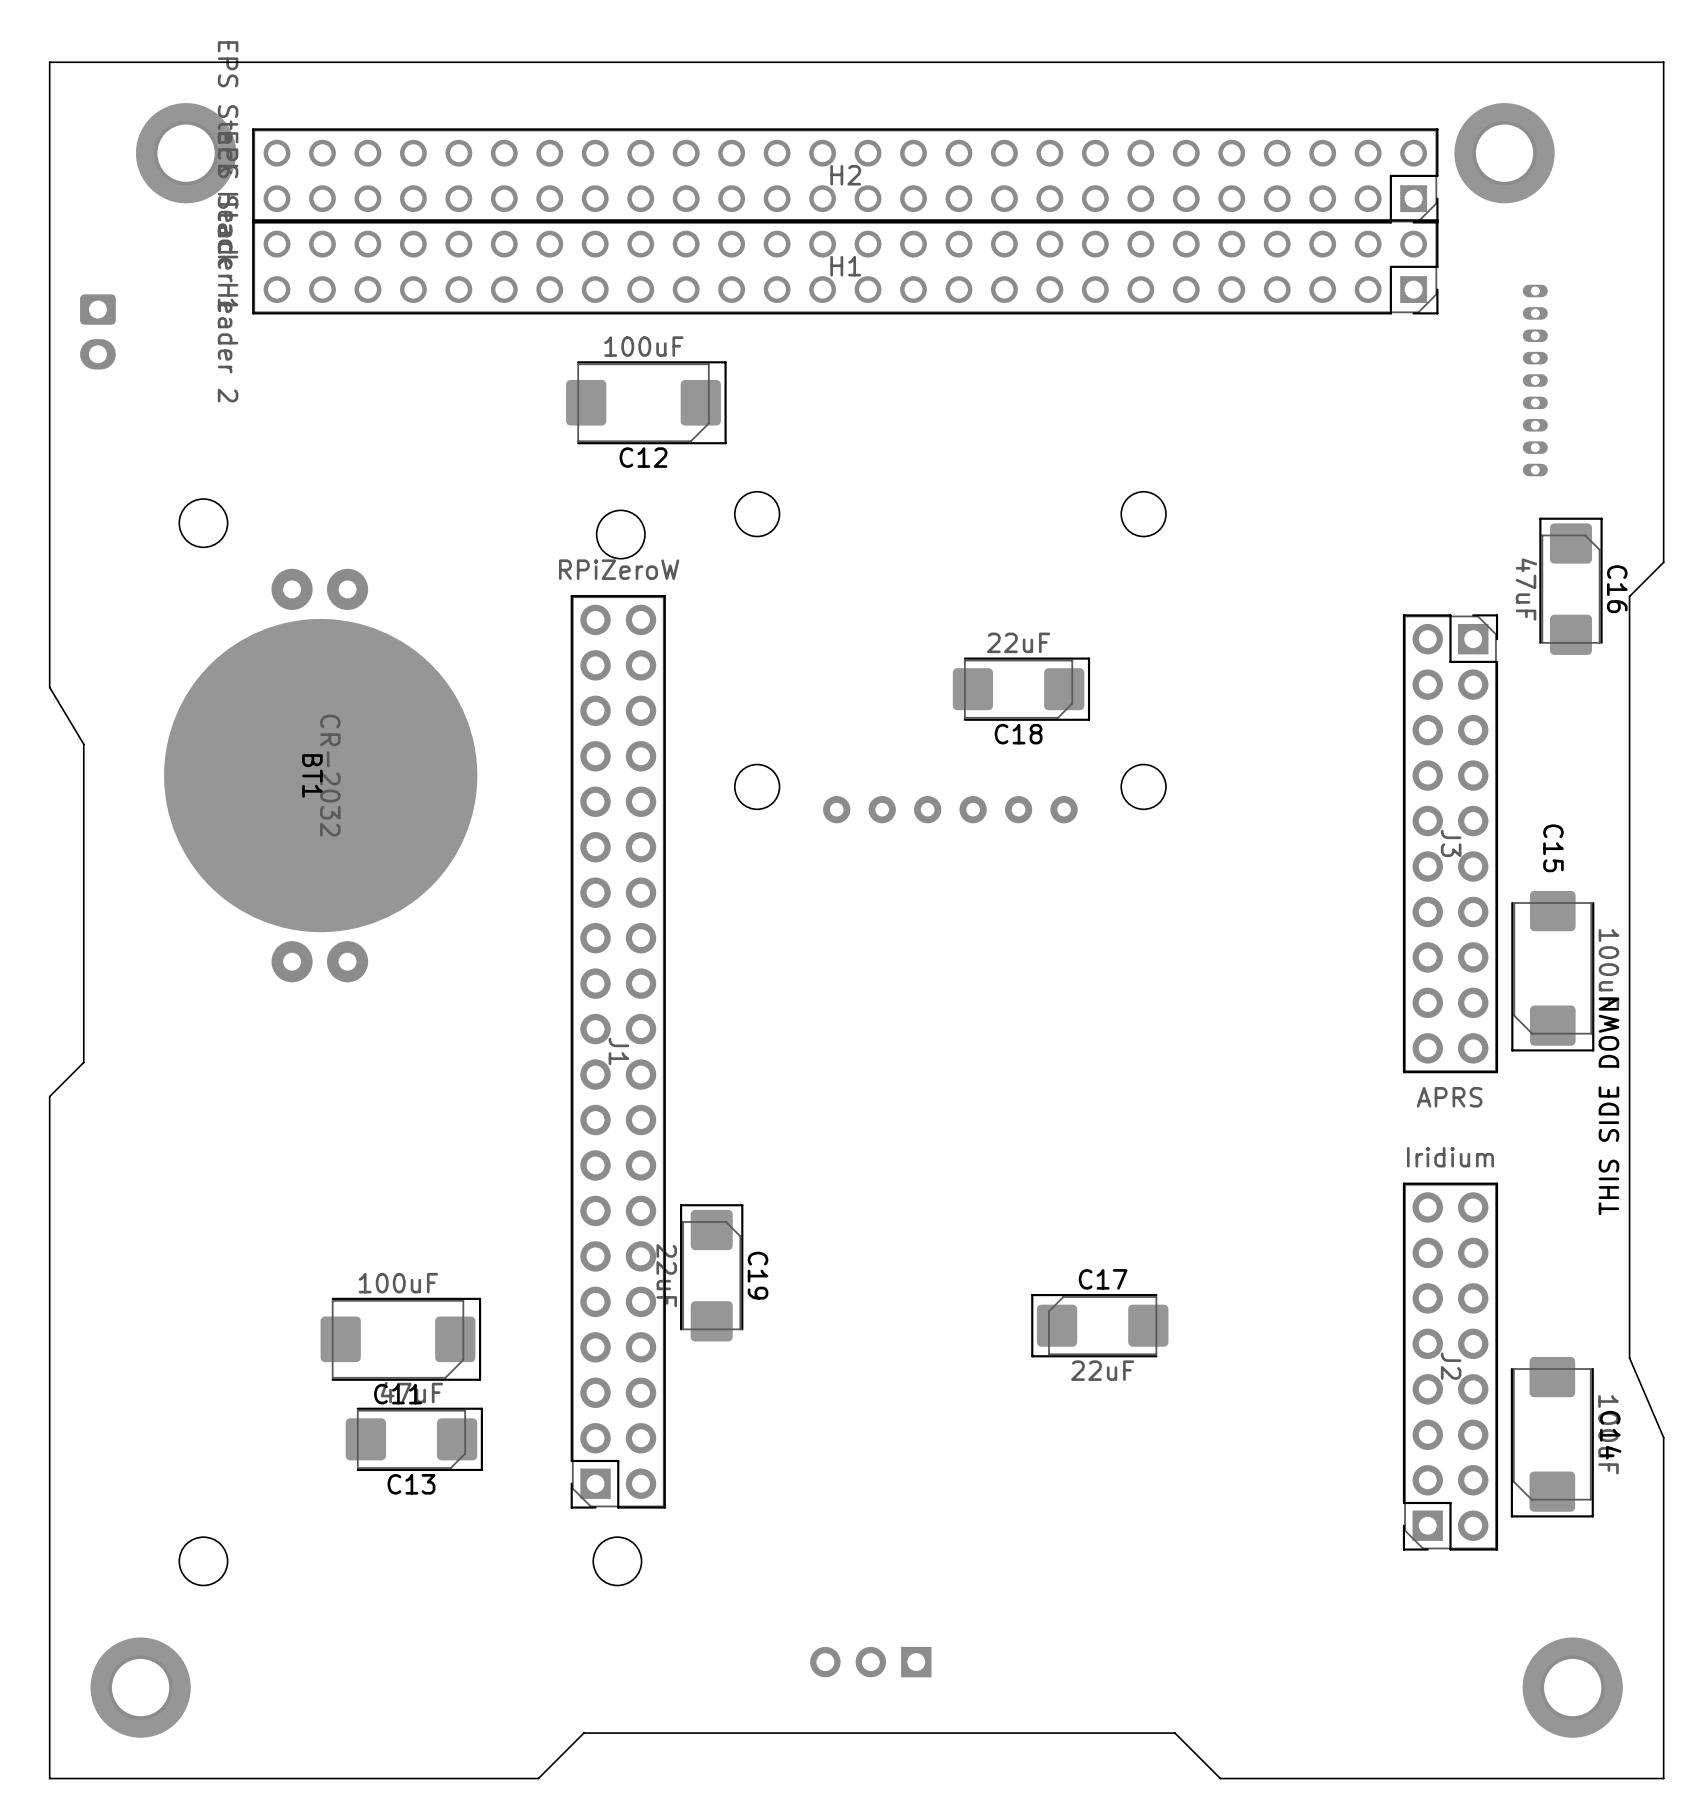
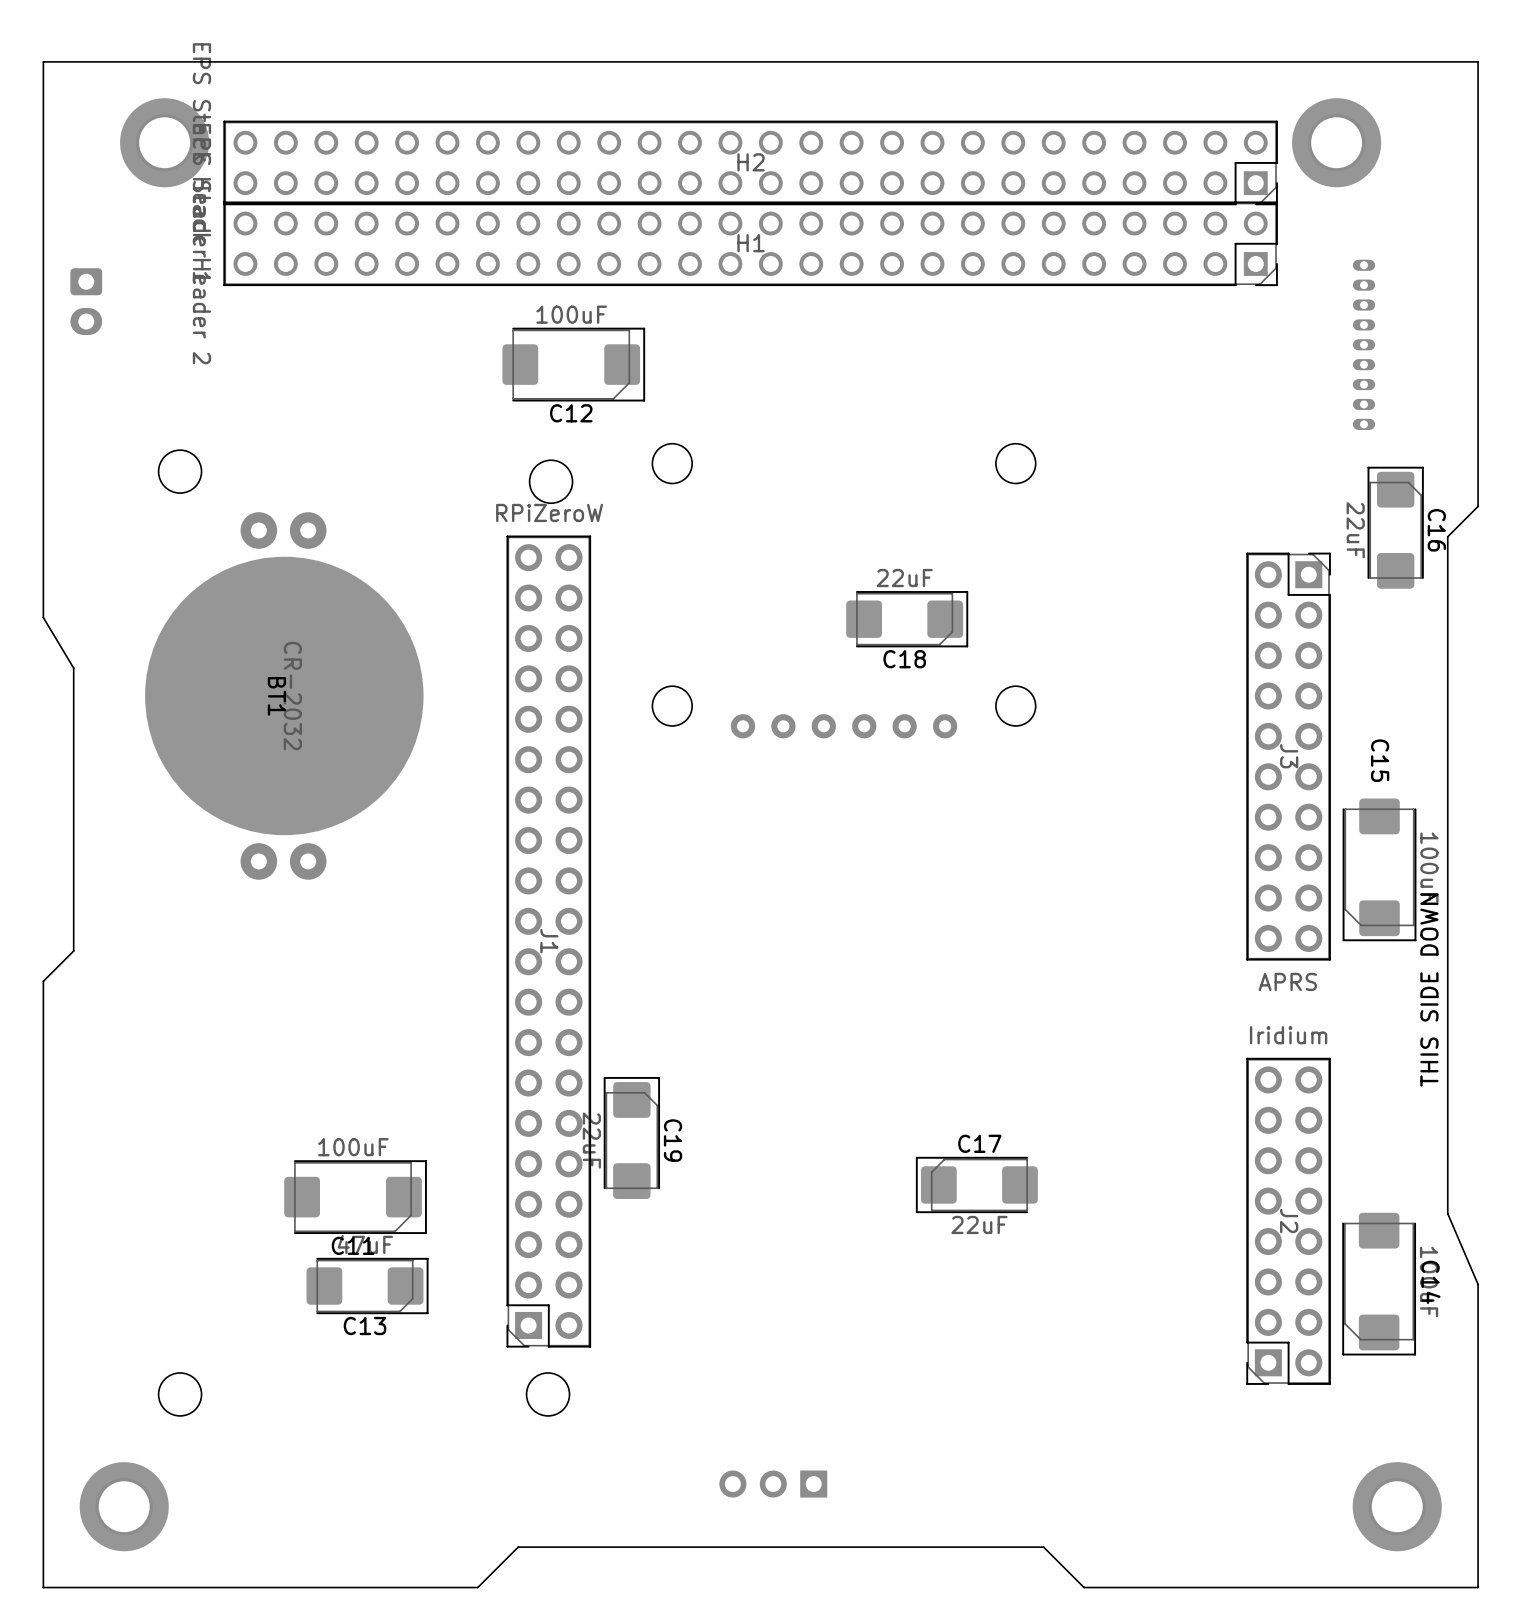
C16 value: 47uF (1526, 589) -> 22uF (1355, 530)

